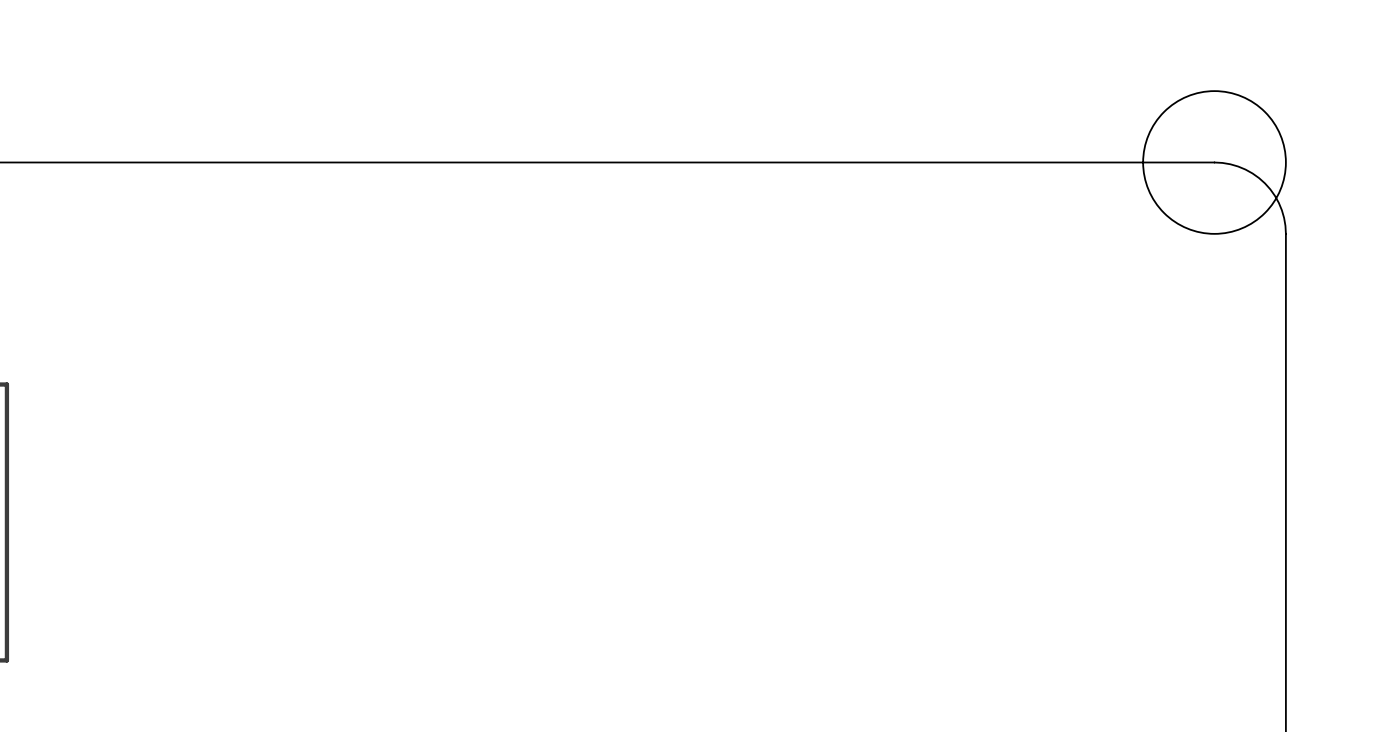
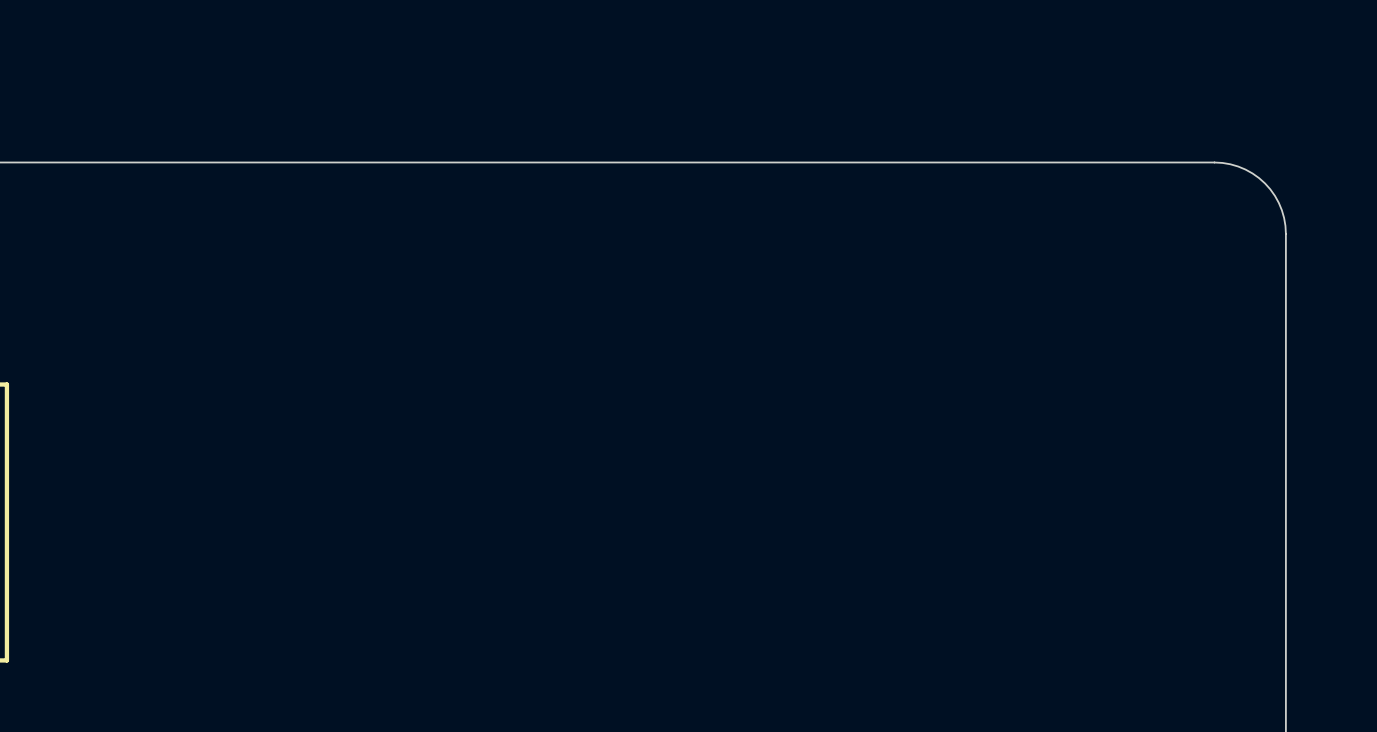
round board edge: [1142, 90, 1287, 235] -> none

